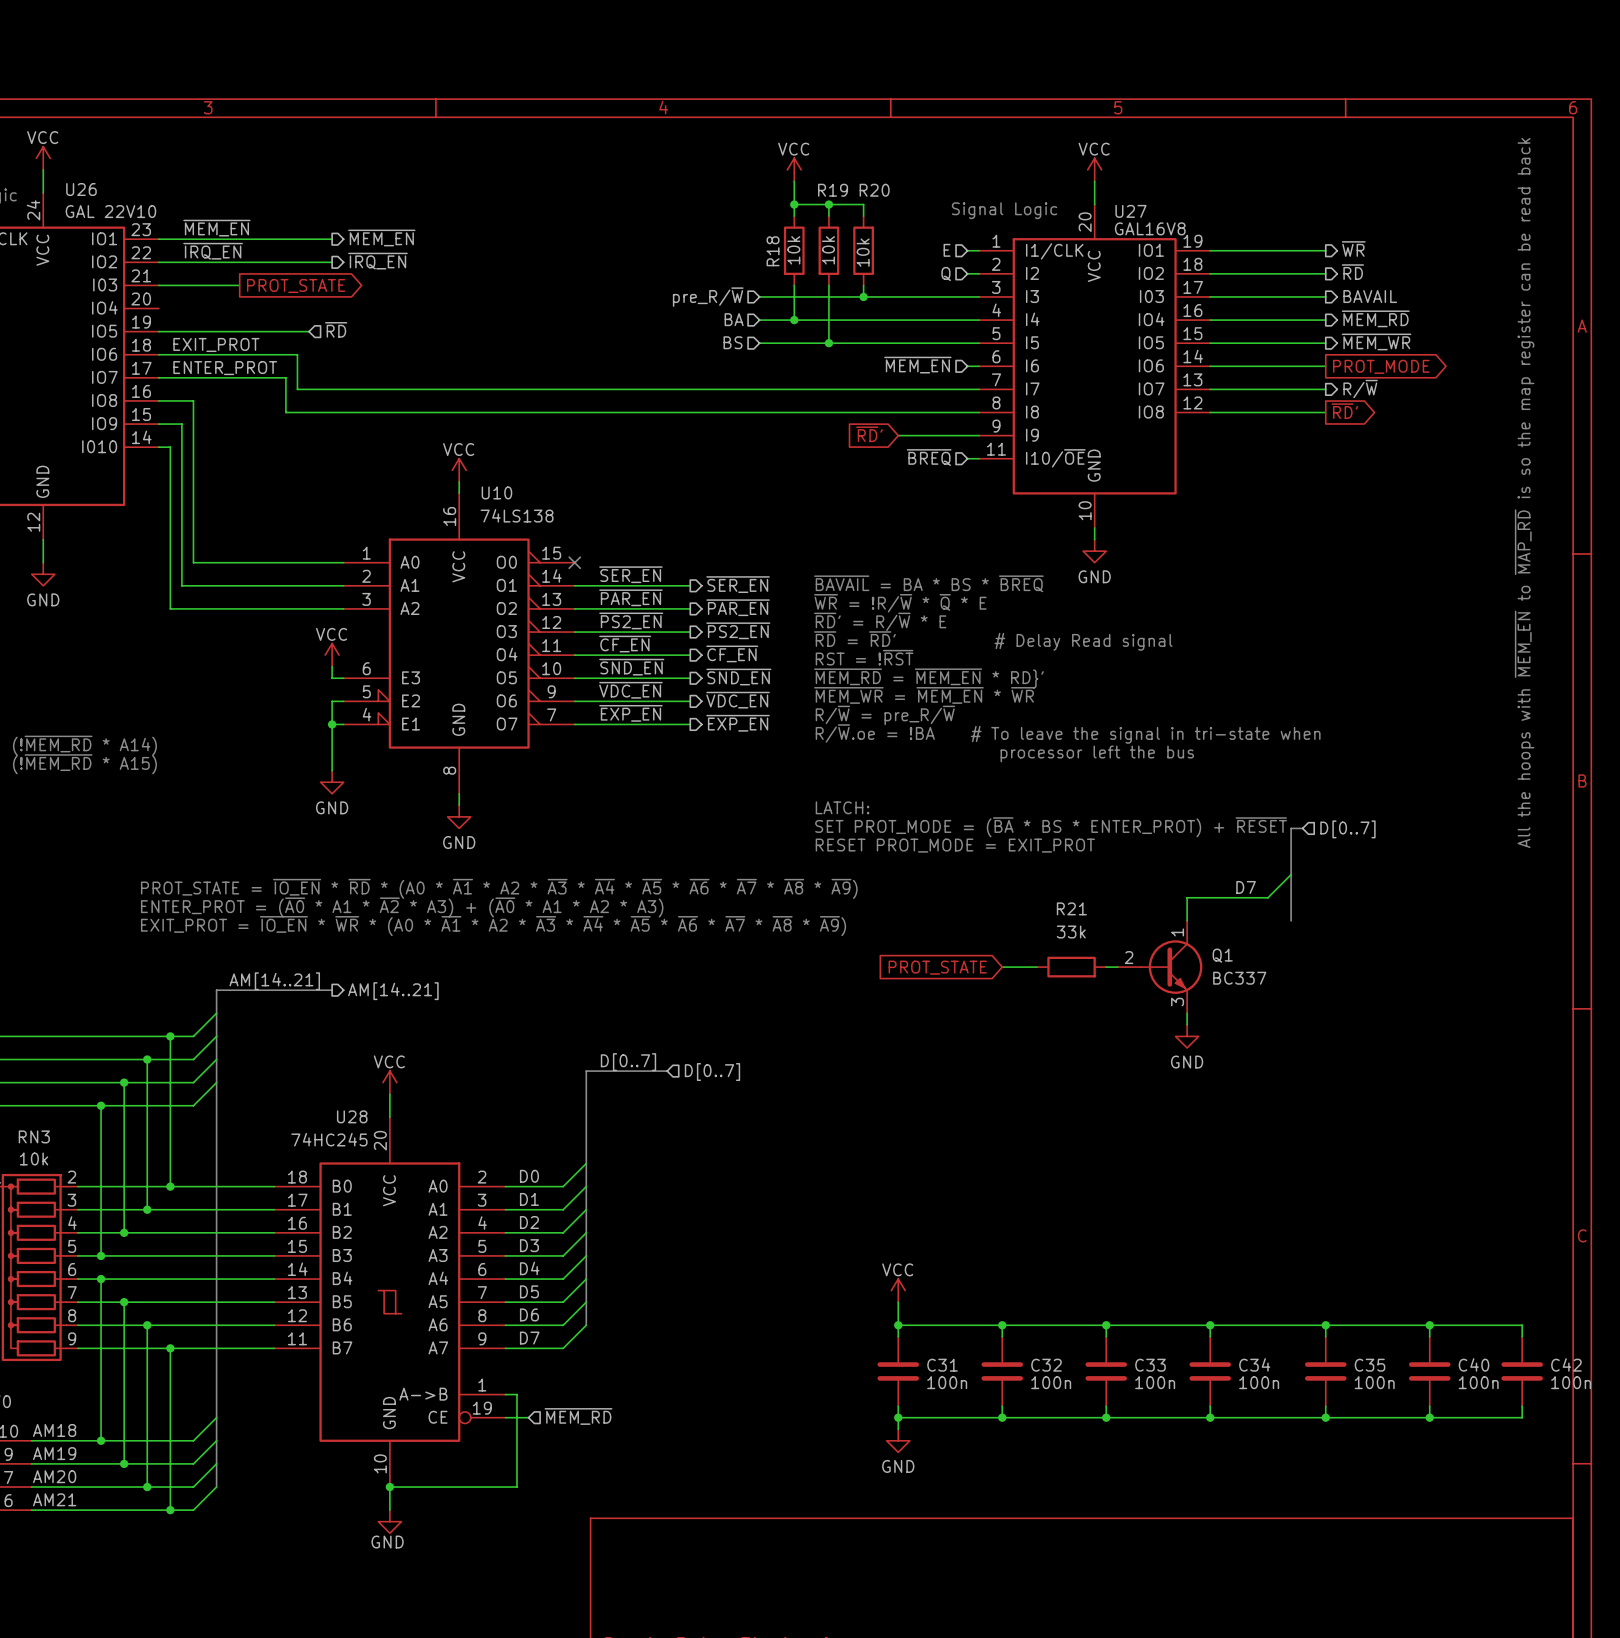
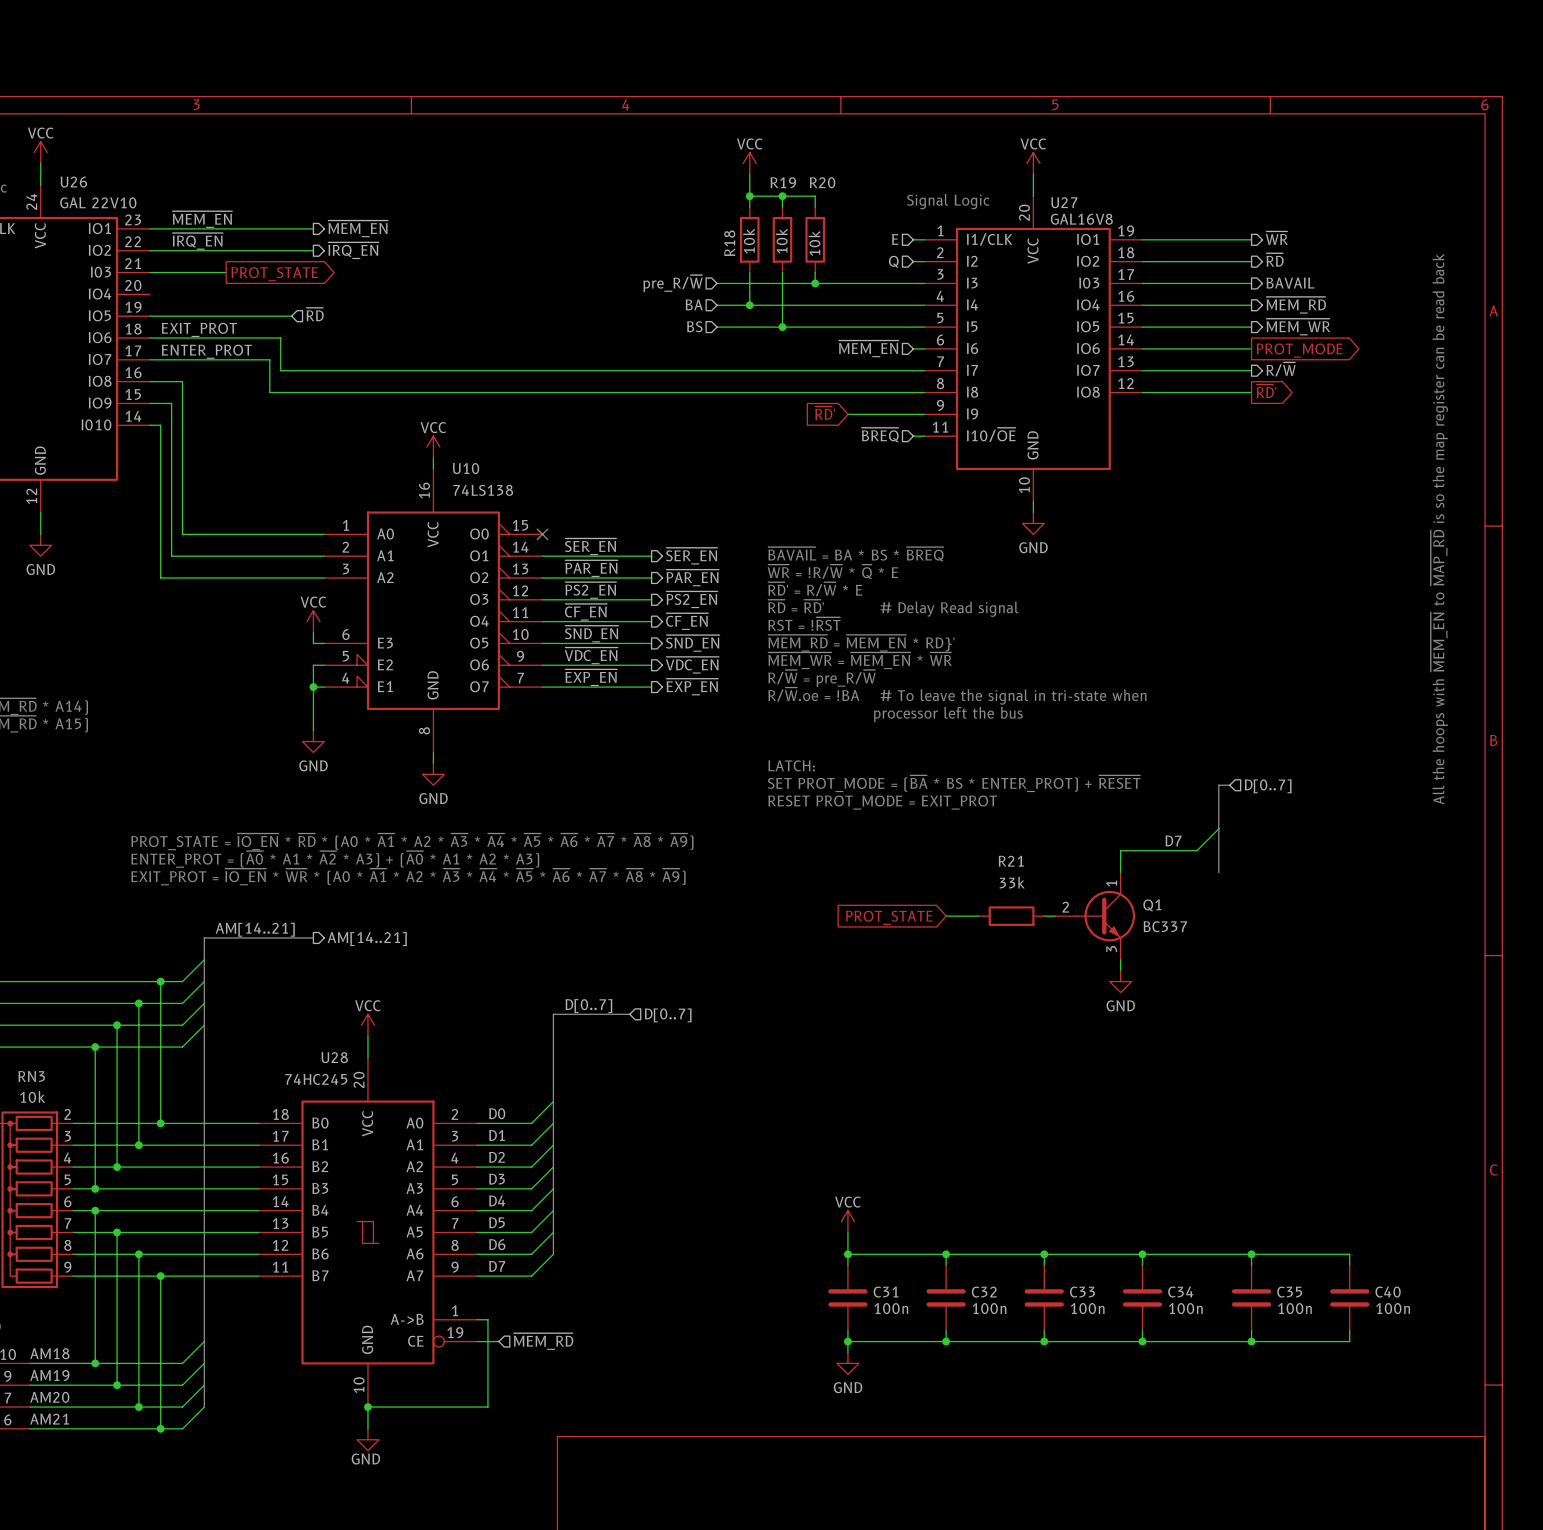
wire: (1429, 1325) (1522, 1325) (1522, 1336) -> none
junction: (1429, 1325) -> none
C42: 100n (1522, 1371) -> none
wire: (1522, 1406) (1522, 1417) (1429, 1417) -> none
junction: (1429, 1417) -> none

